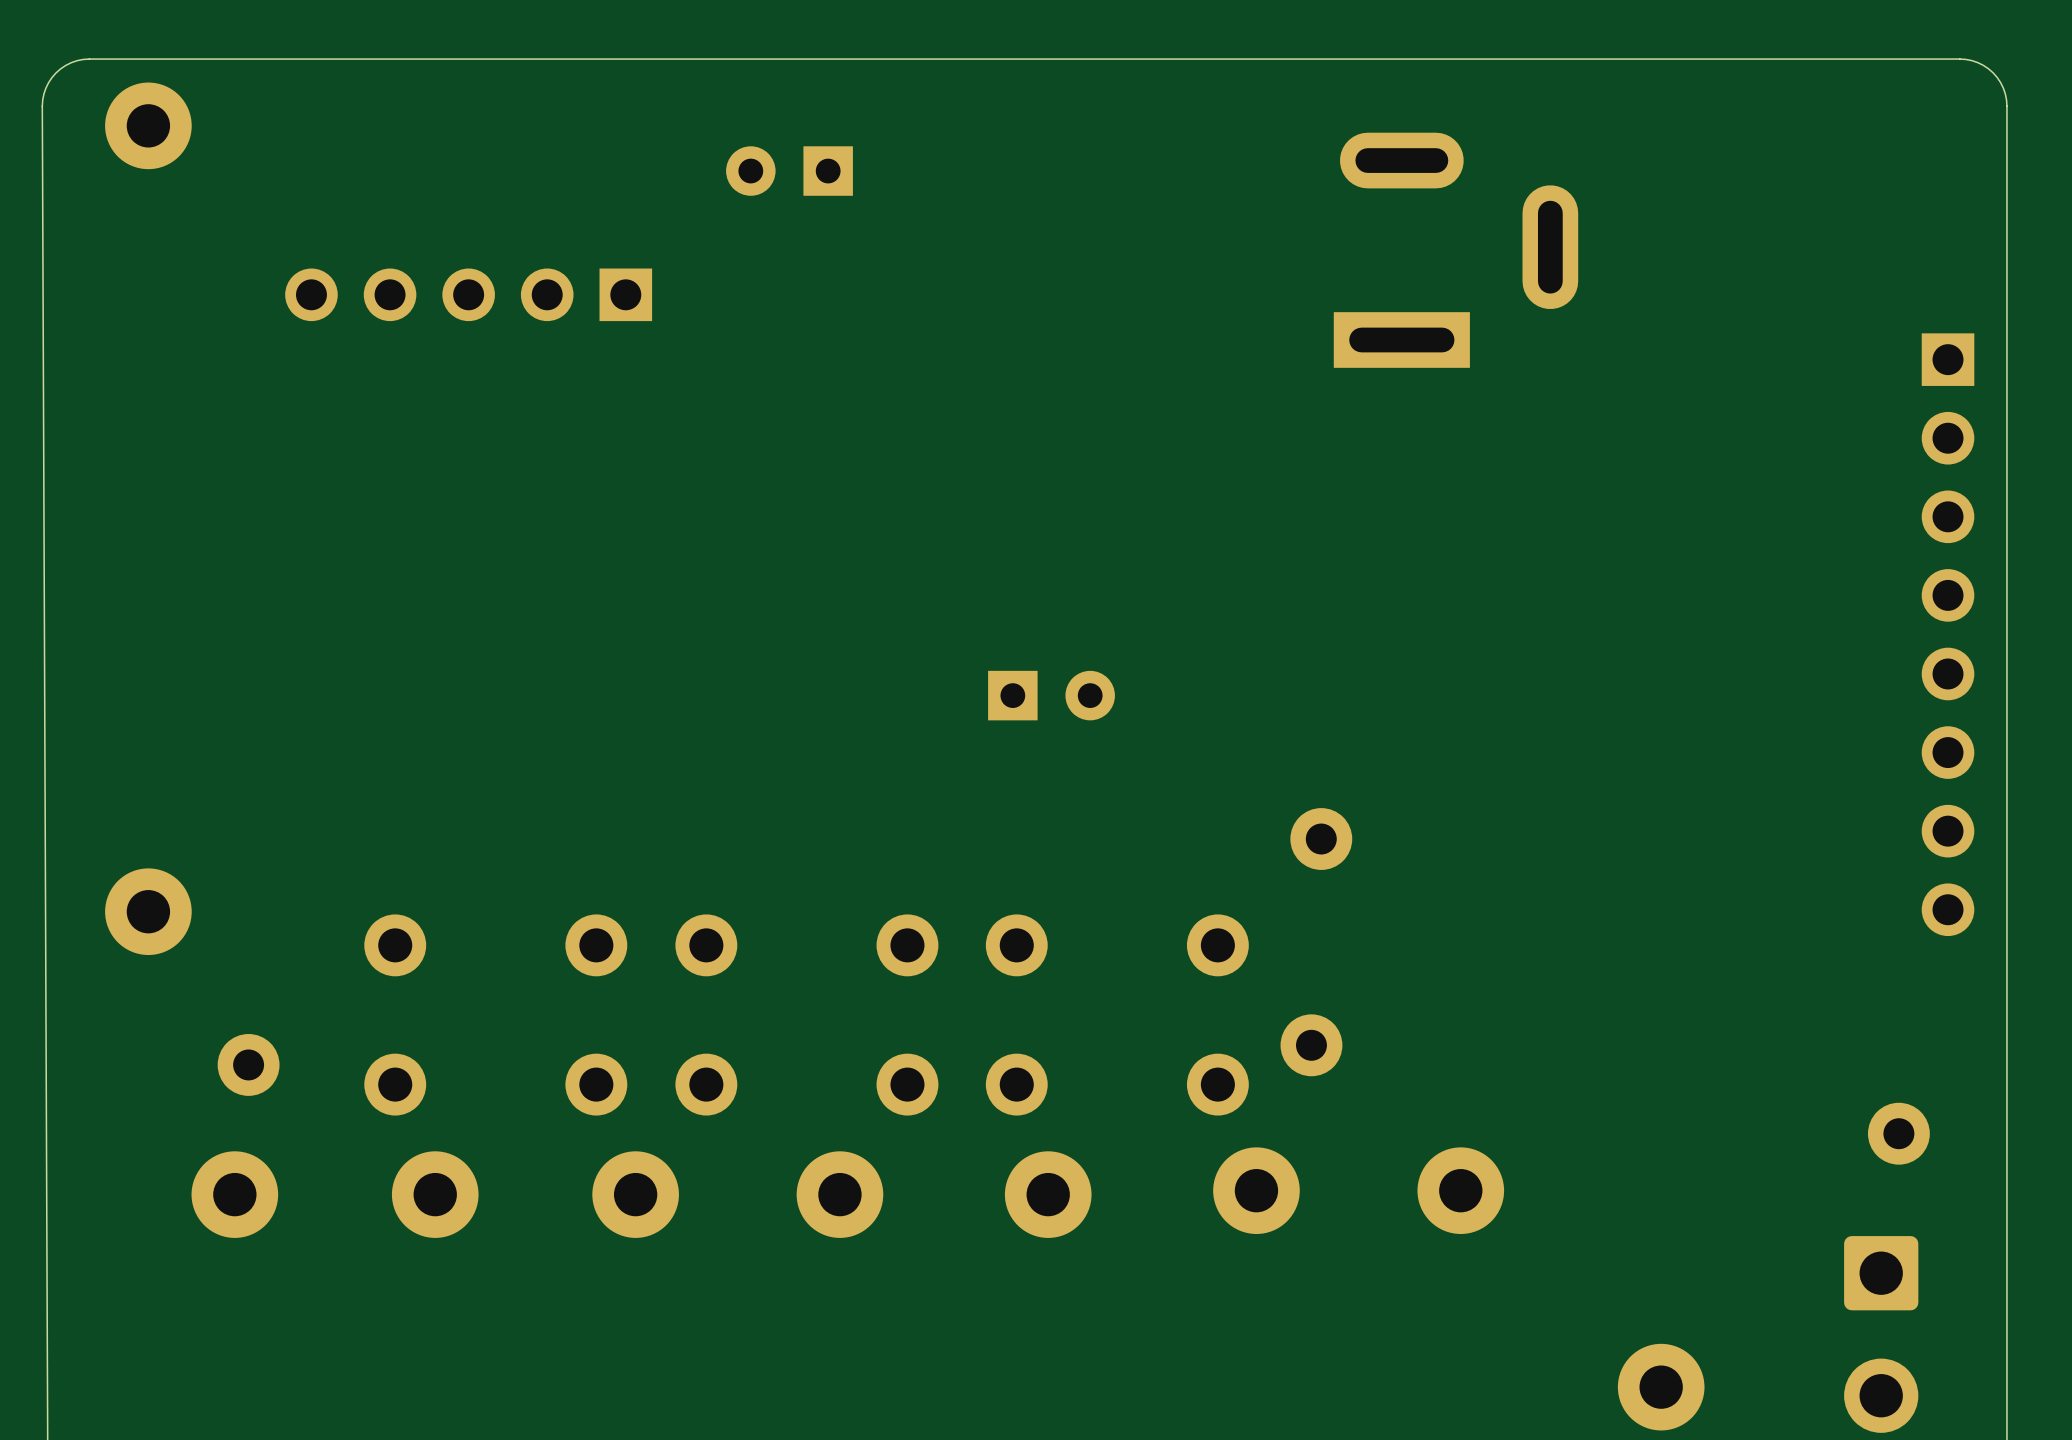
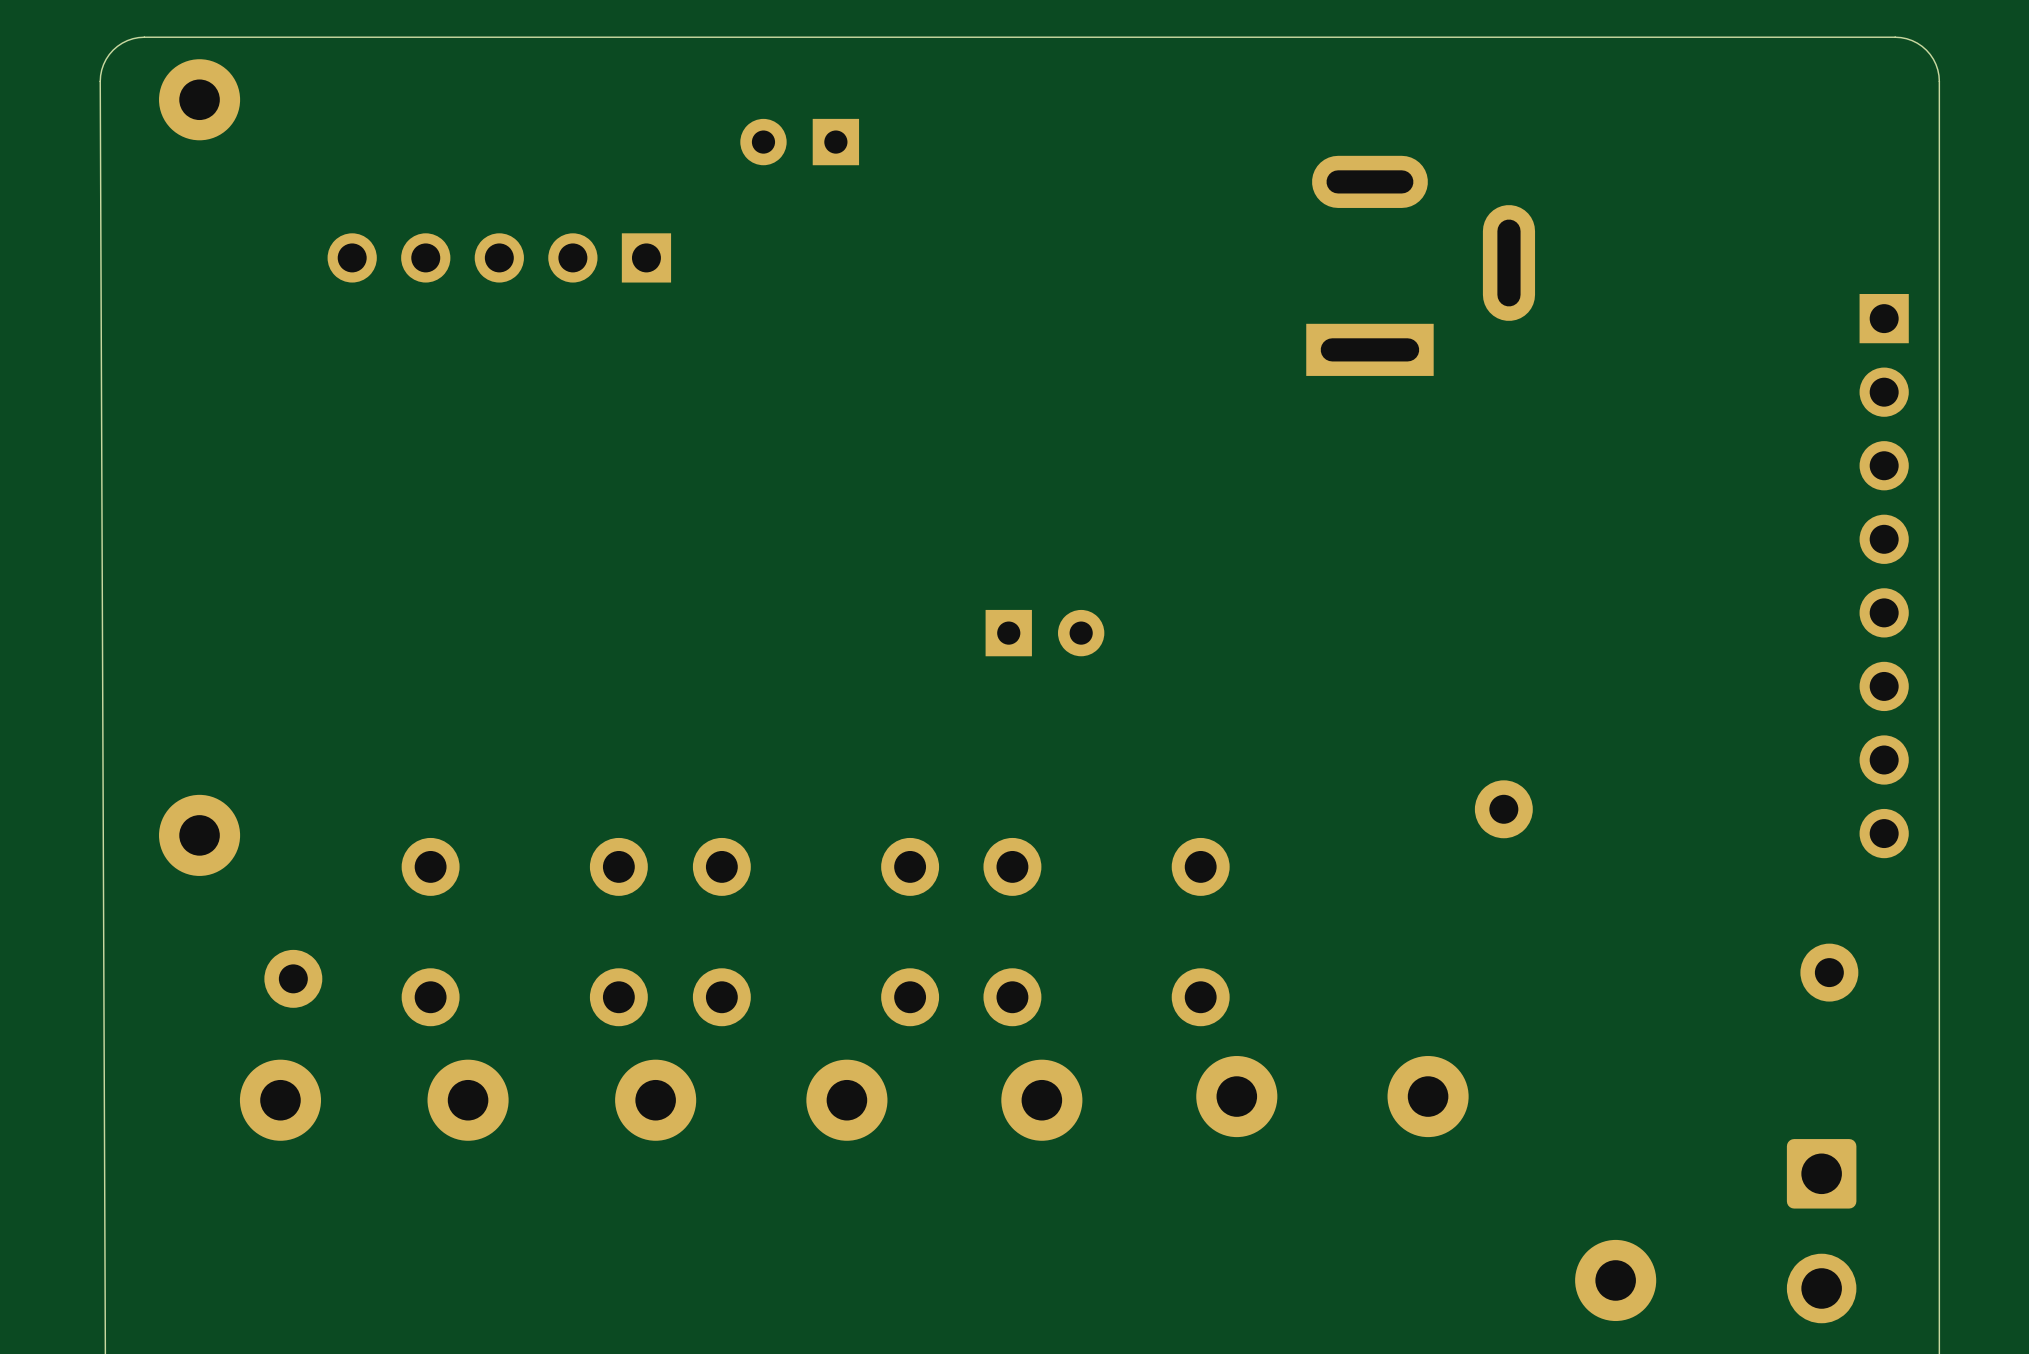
part position: (1455, 250) -> (1420, 265)
part: (1321, 839) -> none
part: none -> (1503, 809)
part: (1311, 1045) -> none
part position: (1898, 1133) -> (1829, 972)

